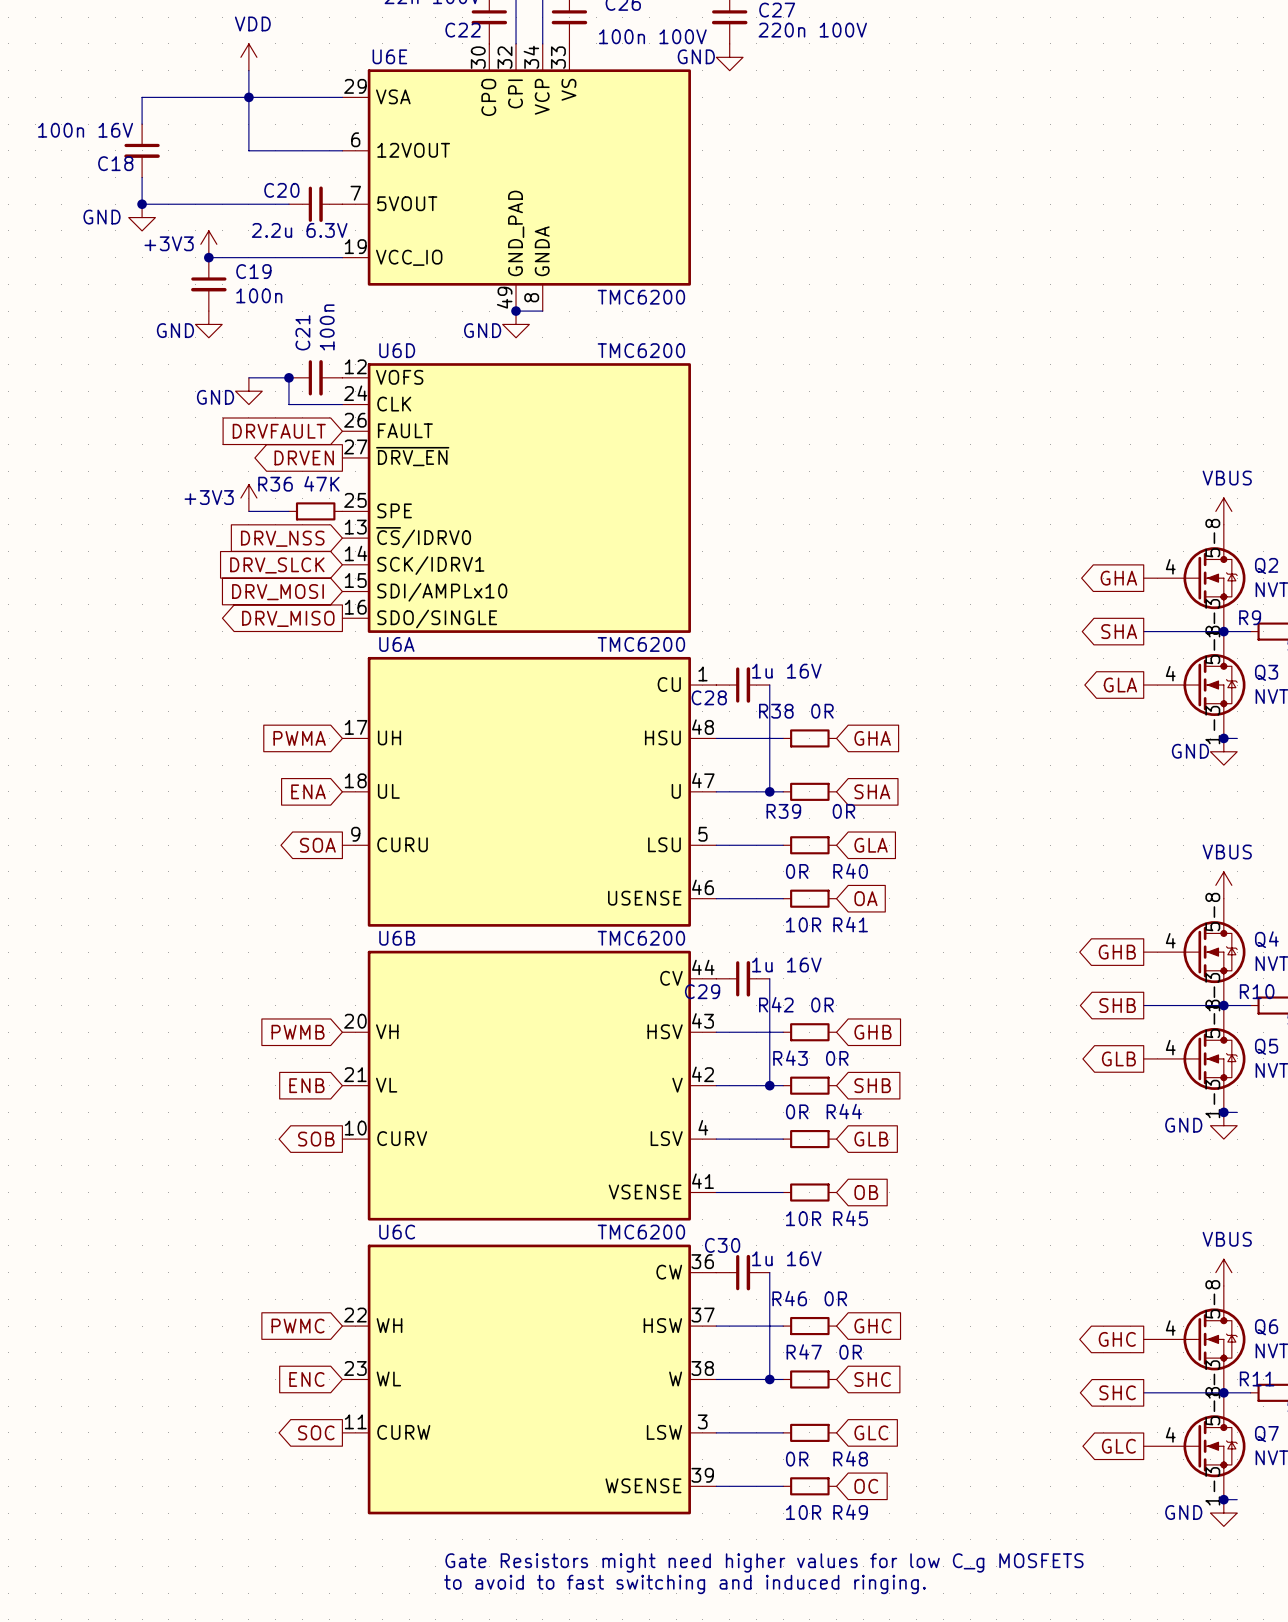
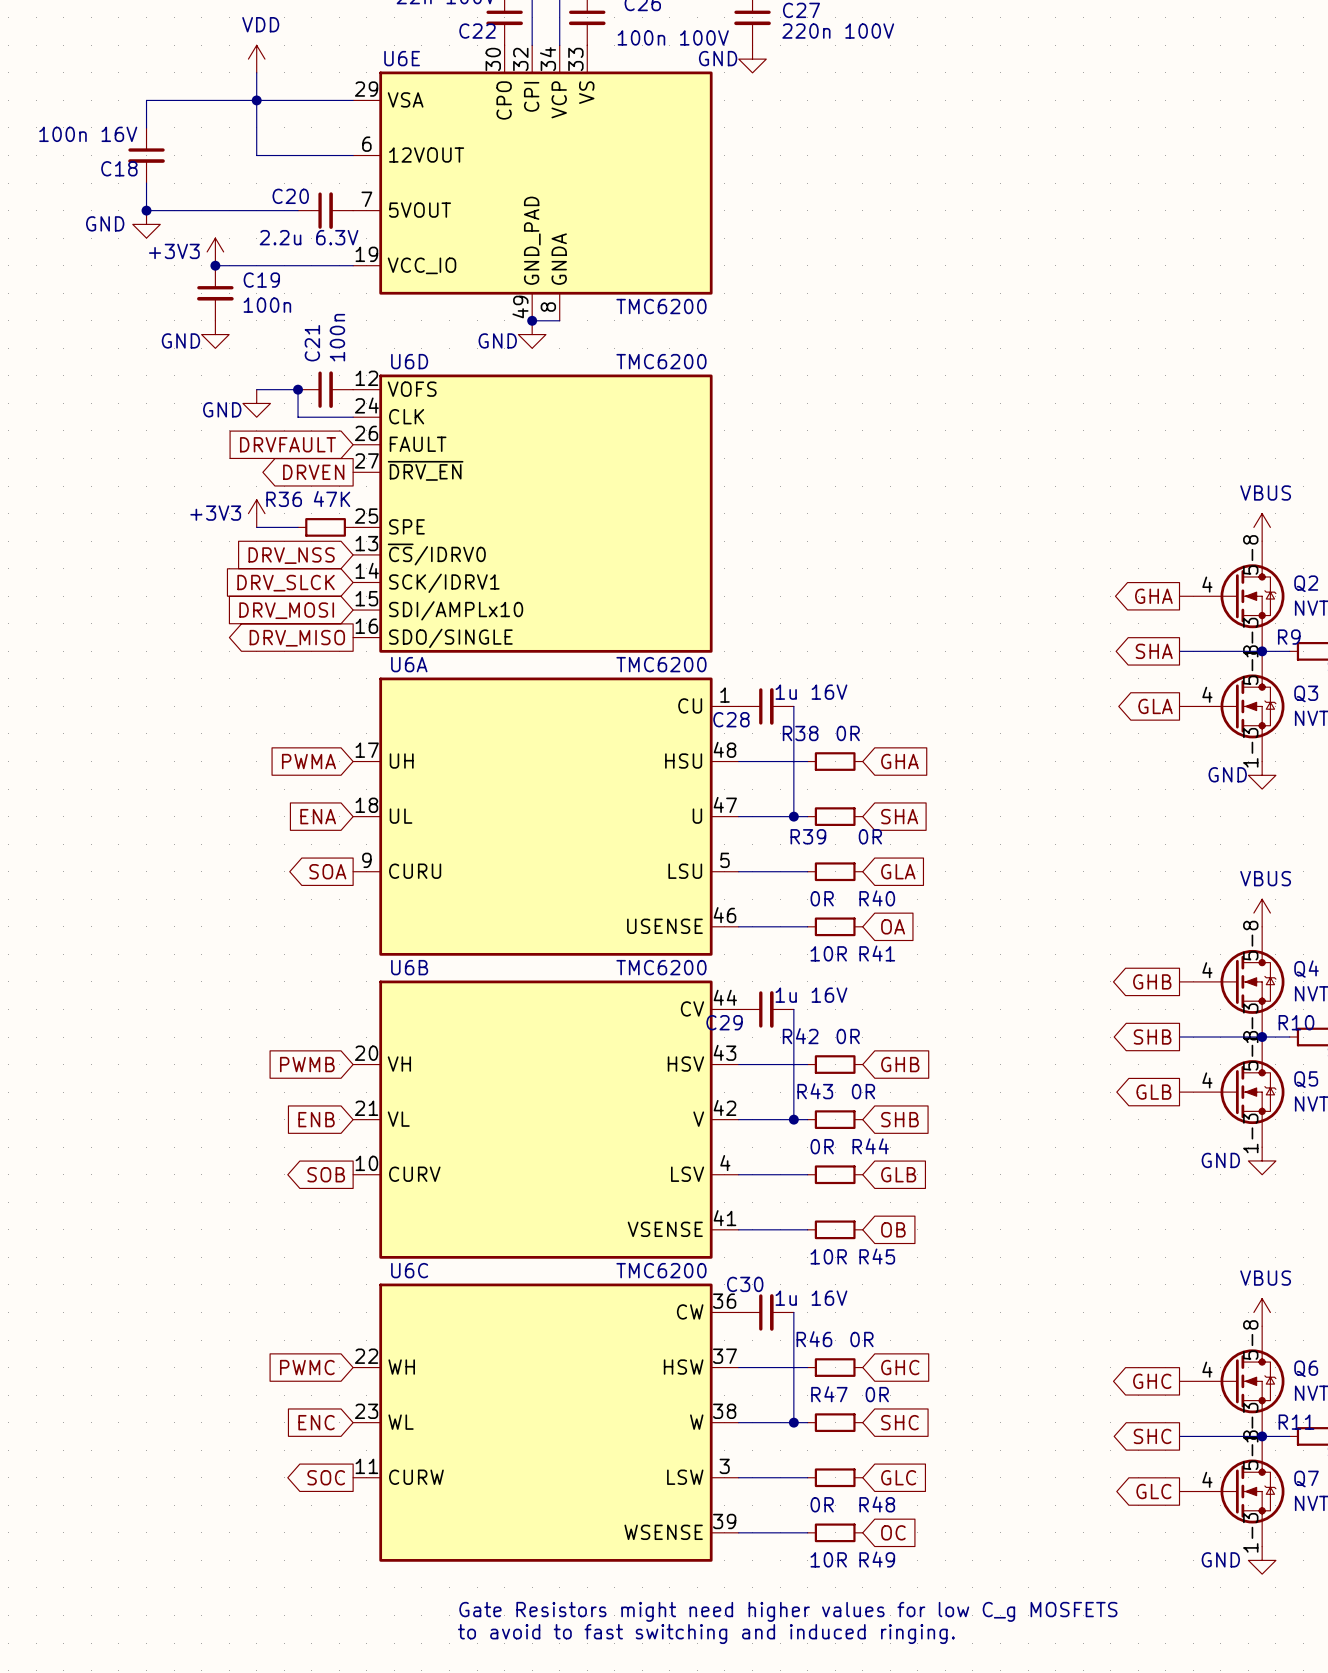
wire: (1223, 738) (1237, 738) -> none
junction: (1223, 738) -> none
wire: (1223, 1112) (1237, 1112) -> none
junction: (1223, 1112) -> none
wire: (1223, 1499) (1237, 1499) -> none
junction: (1223, 1499) -> none

